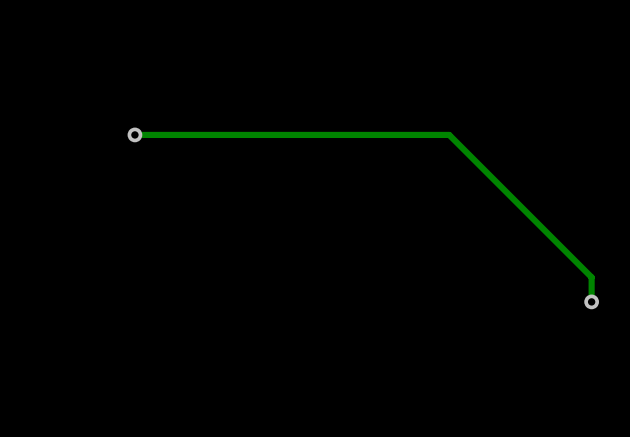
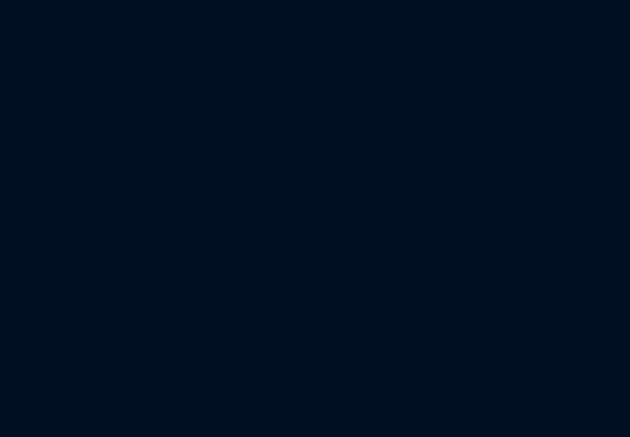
track: (134, 134) (449, 134) (591, 277) (591, 301) -> none
via: (134, 134) -> none
via: (591, 301) -> none

